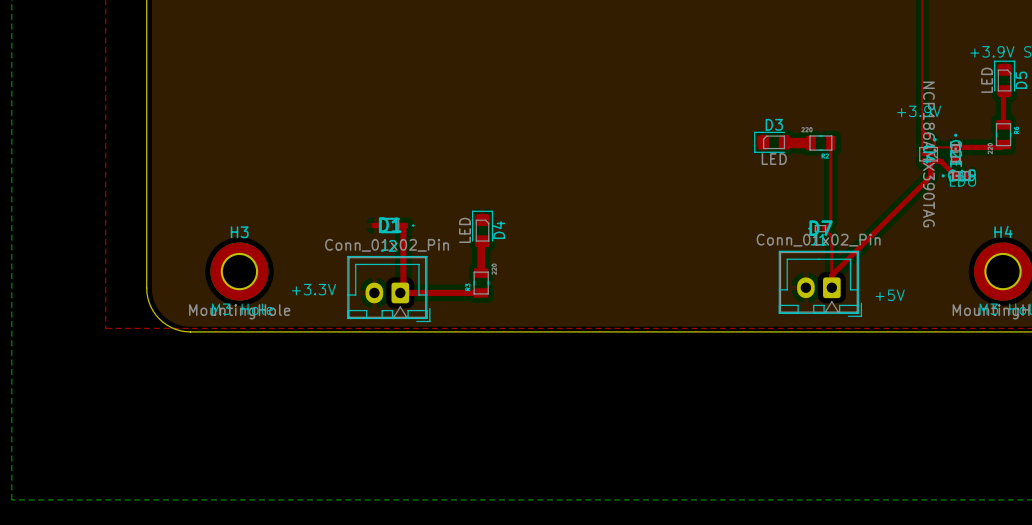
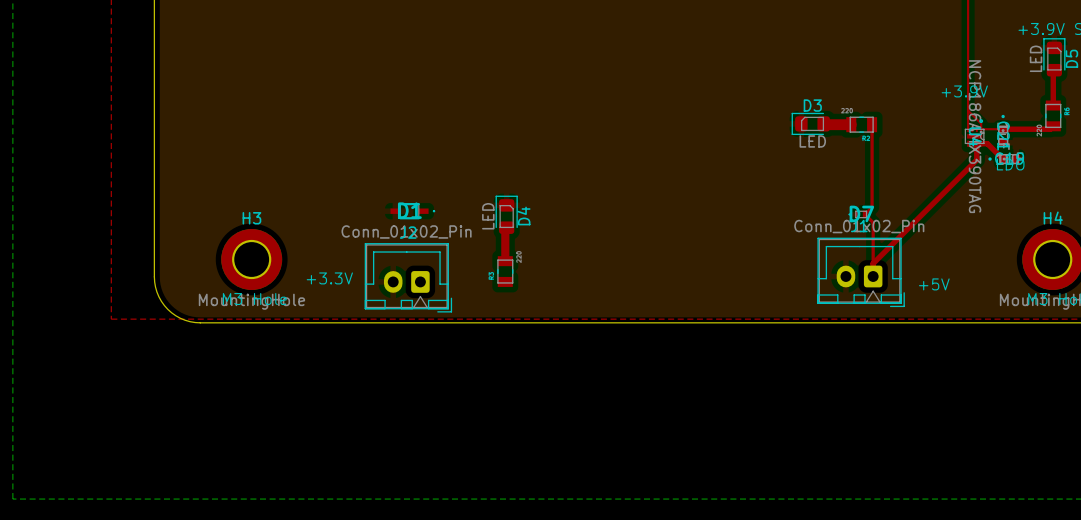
top track: (403, 225) (403, 289) (400, 292) (481, 292) -> none

